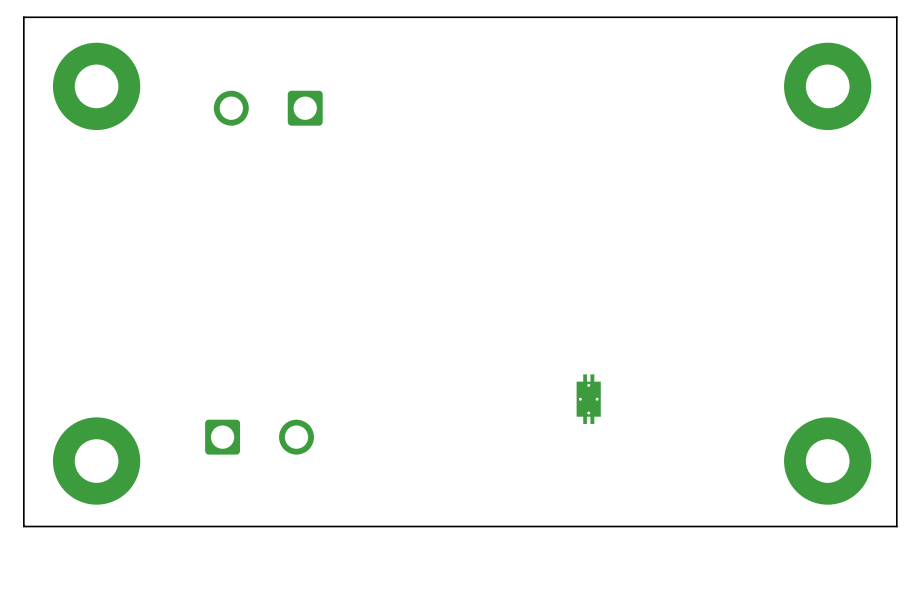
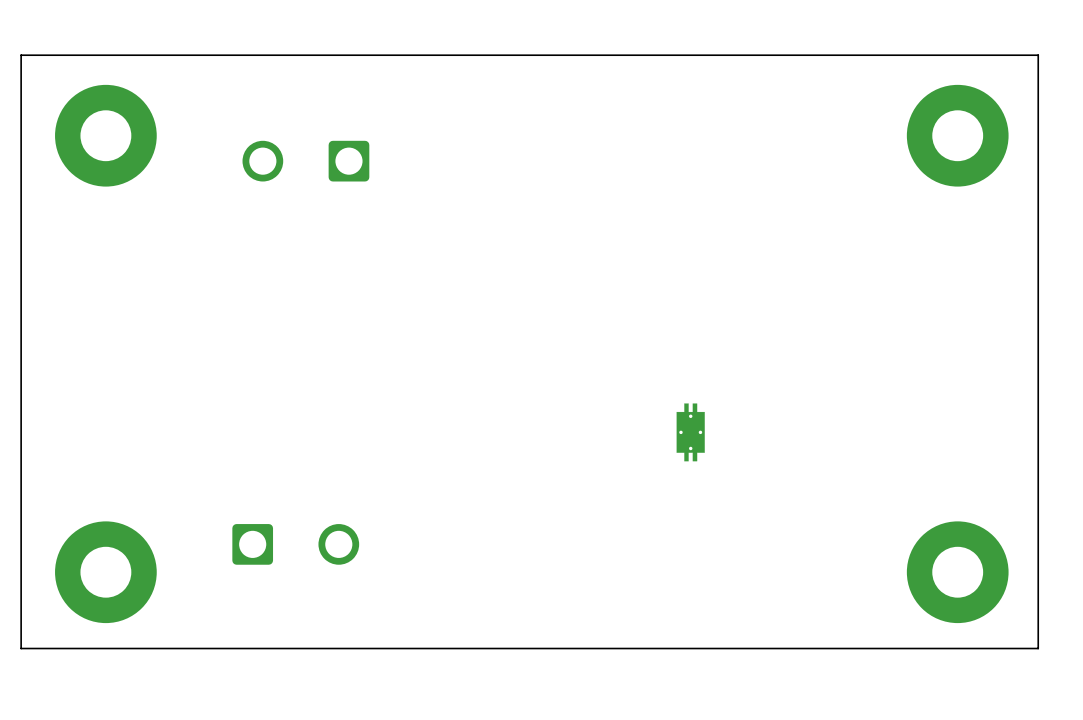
part position: (588, 399) -> (690, 432)

